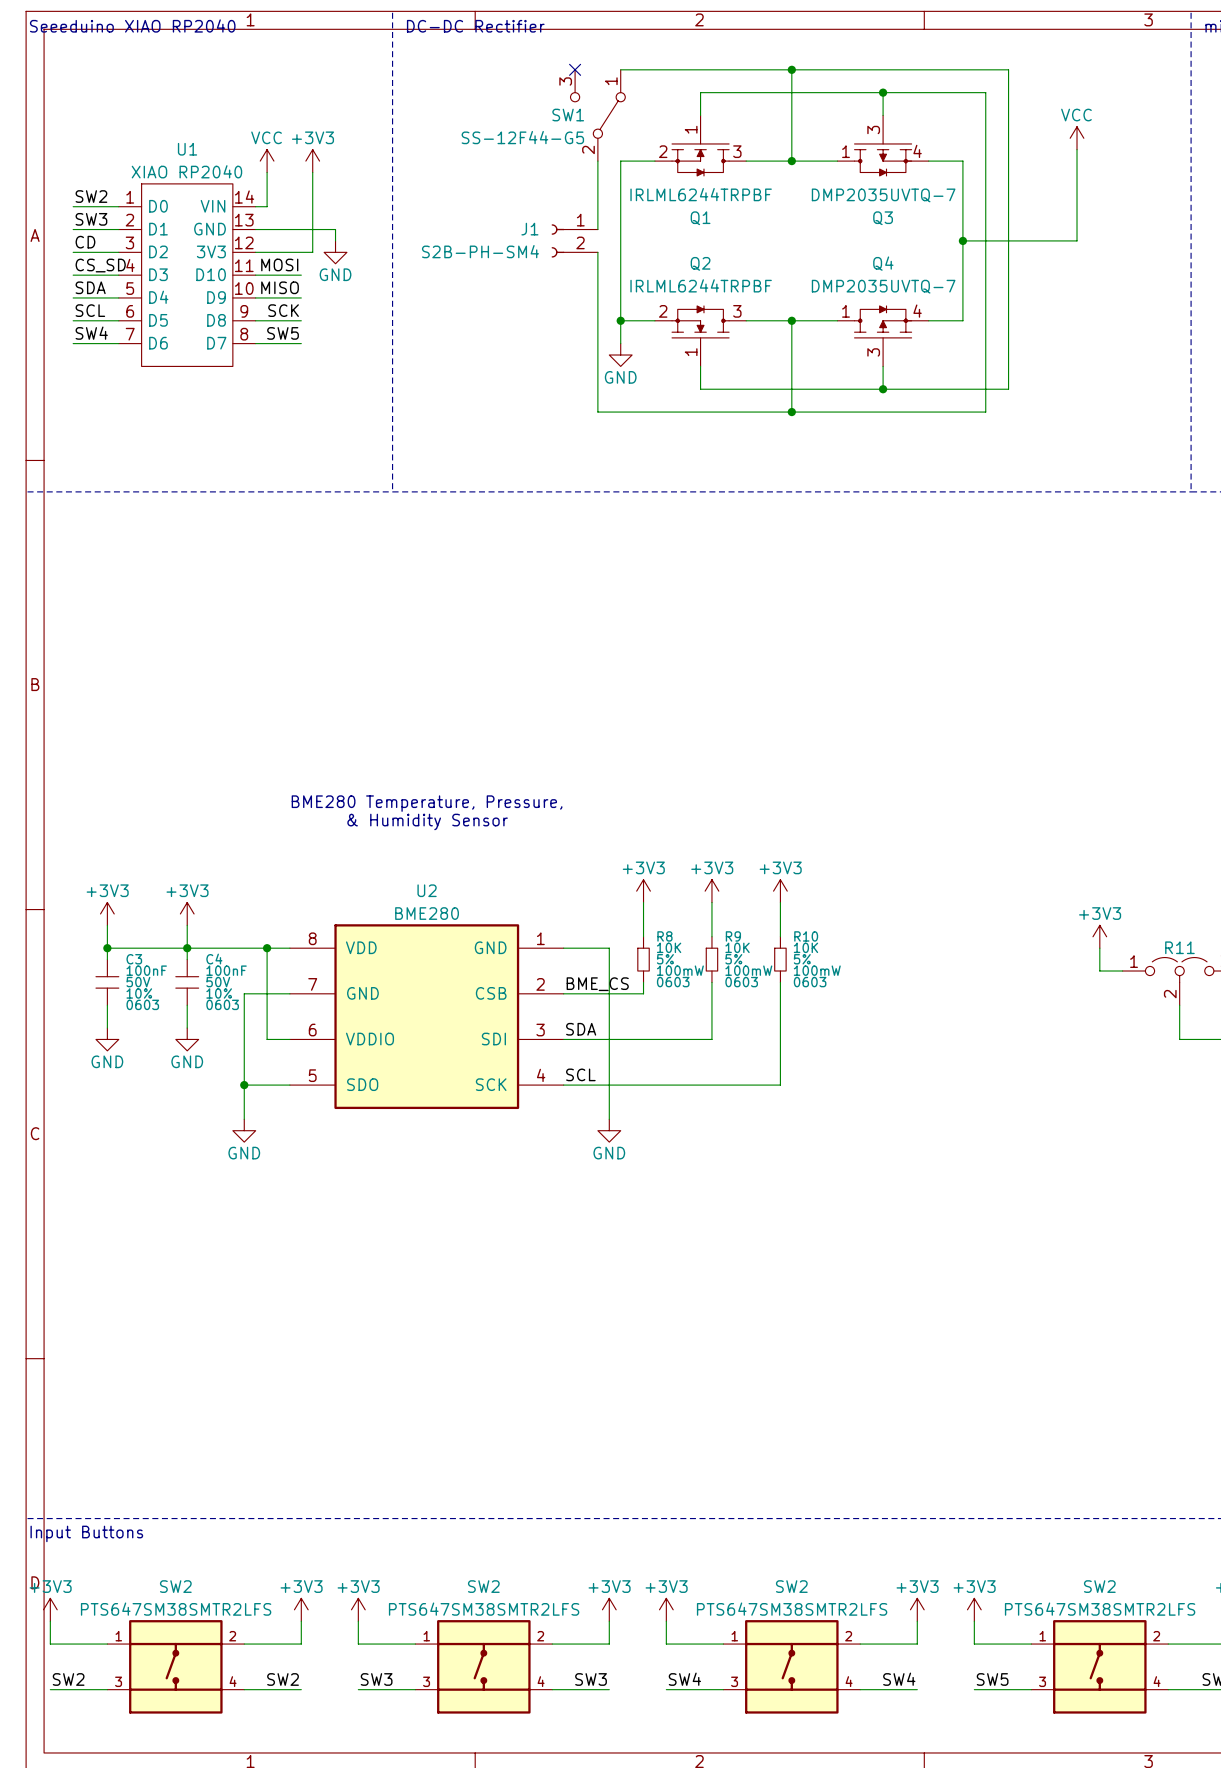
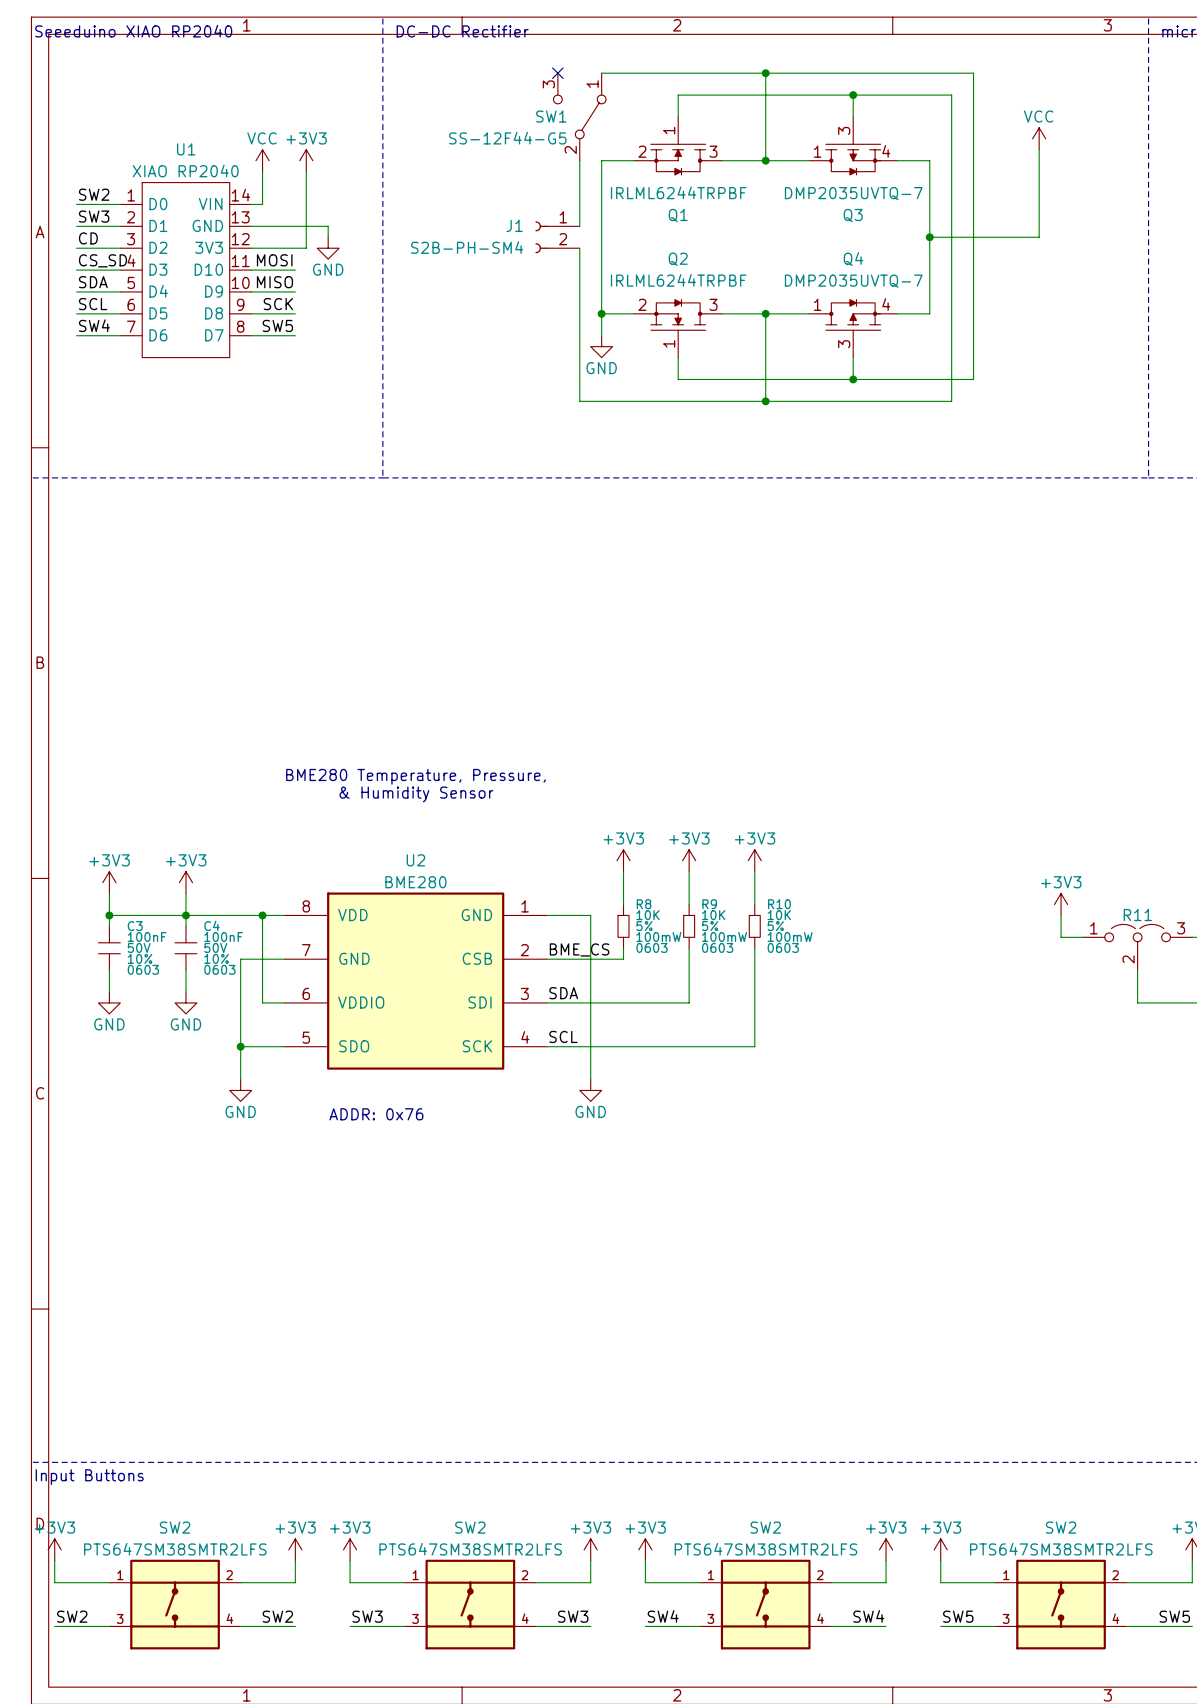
text: none -> ADDR: 0x76 (376, 1114)

